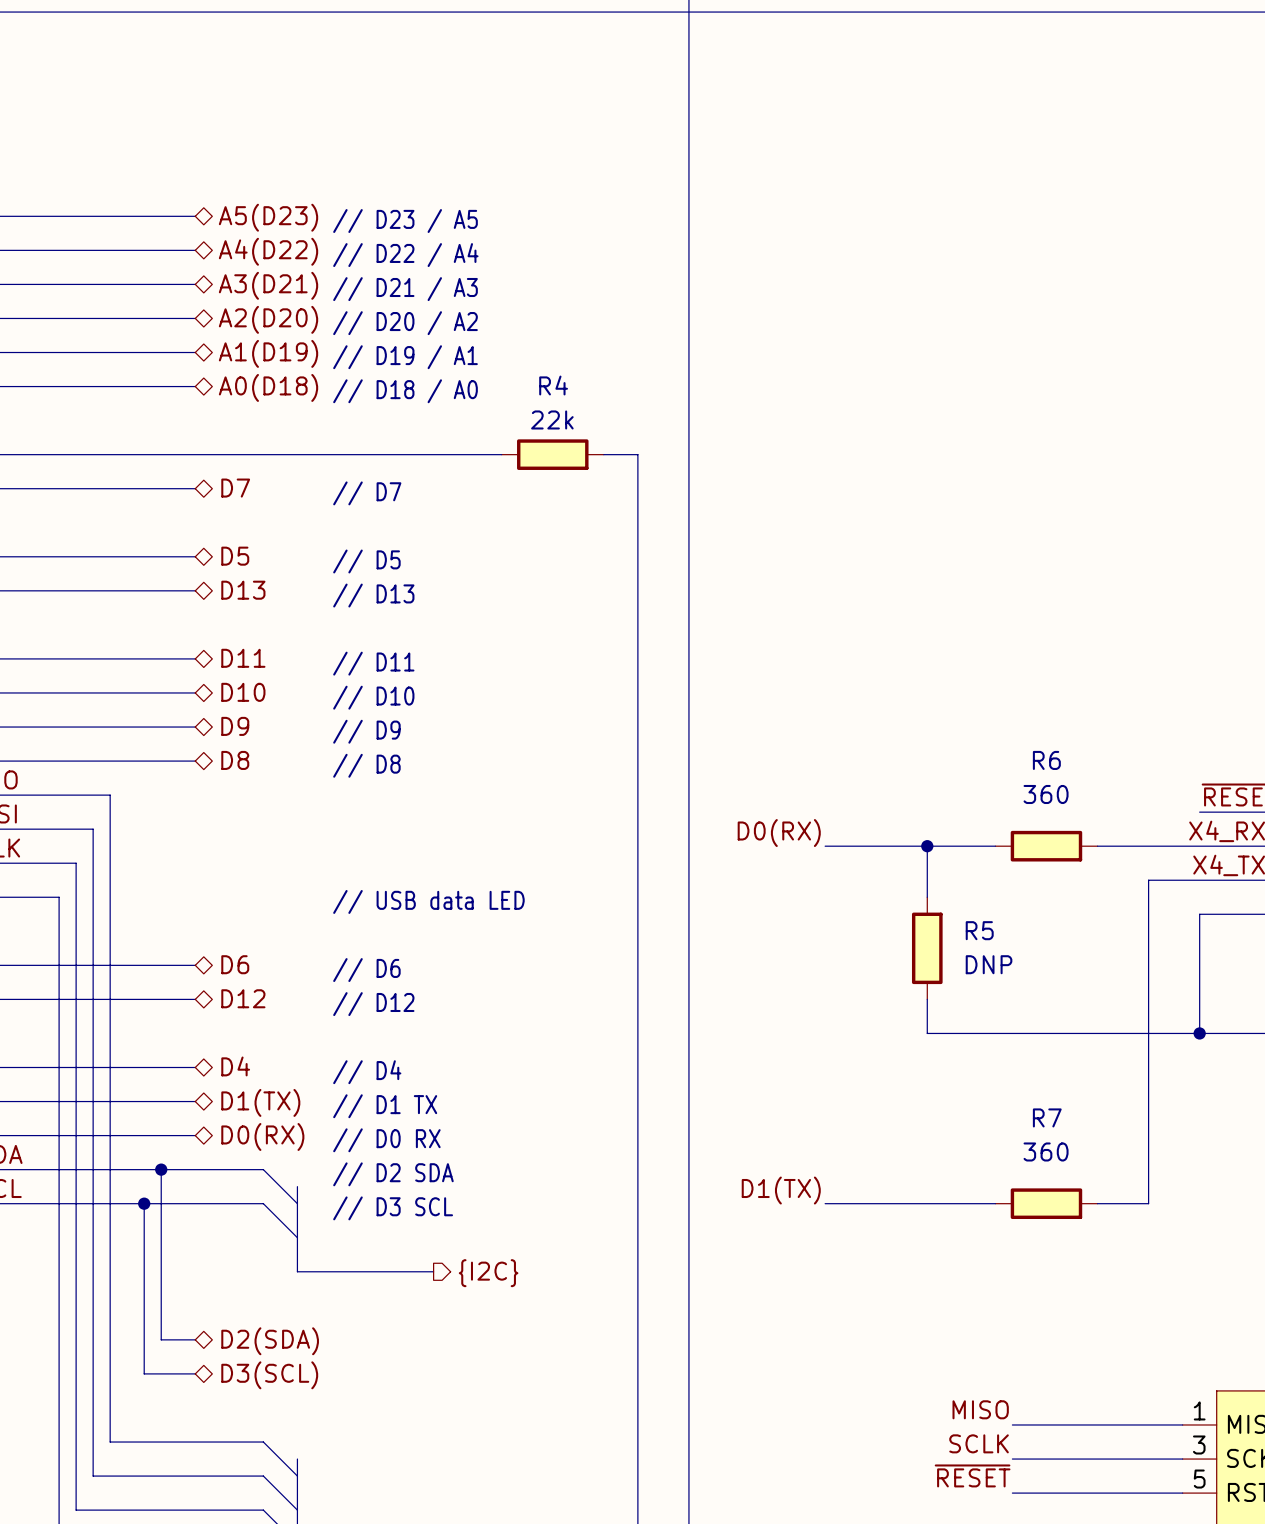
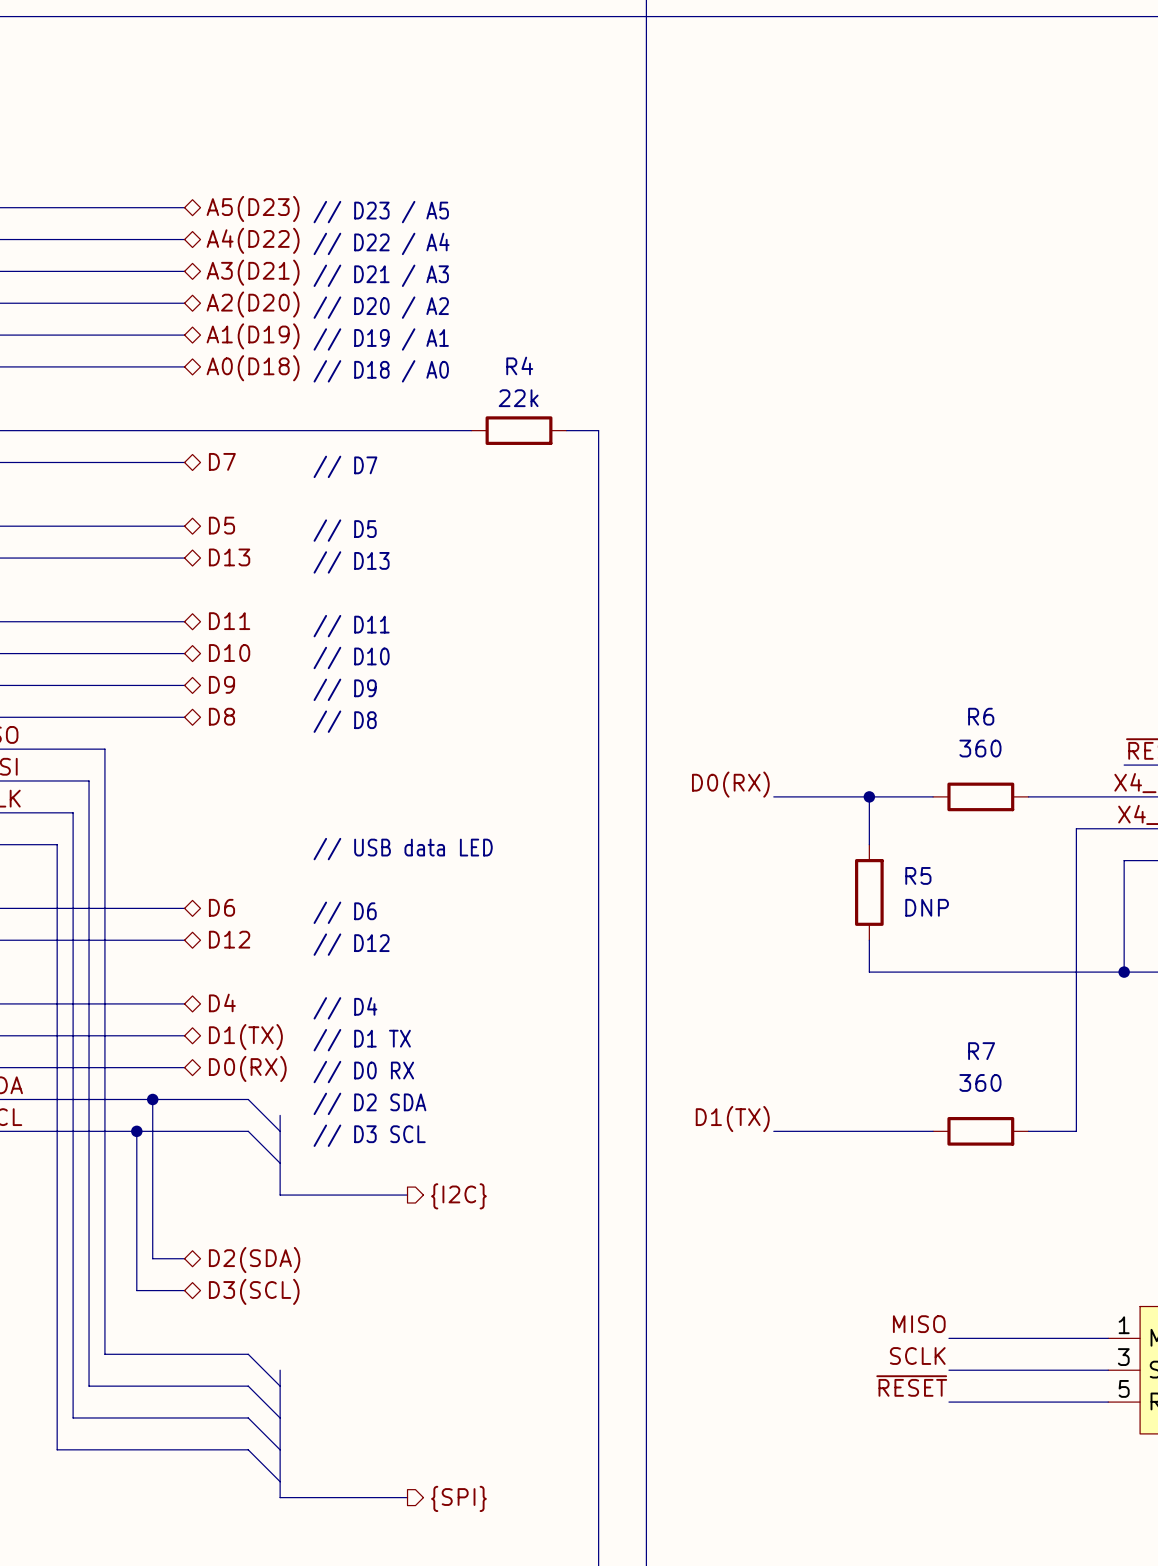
R4 symbol: [501, 439, 604, 470] -> [471, 416, 567, 445]
R6 symbol: [995, 830, 1098, 862] -> [933, 782, 1029, 812]
R5 symbol: [911, 897, 943, 1000] -> [855, 844, 884, 941]
R7 symbol: [995, 1188, 1098, 1220] -> [933, 1117, 1029, 1146]

